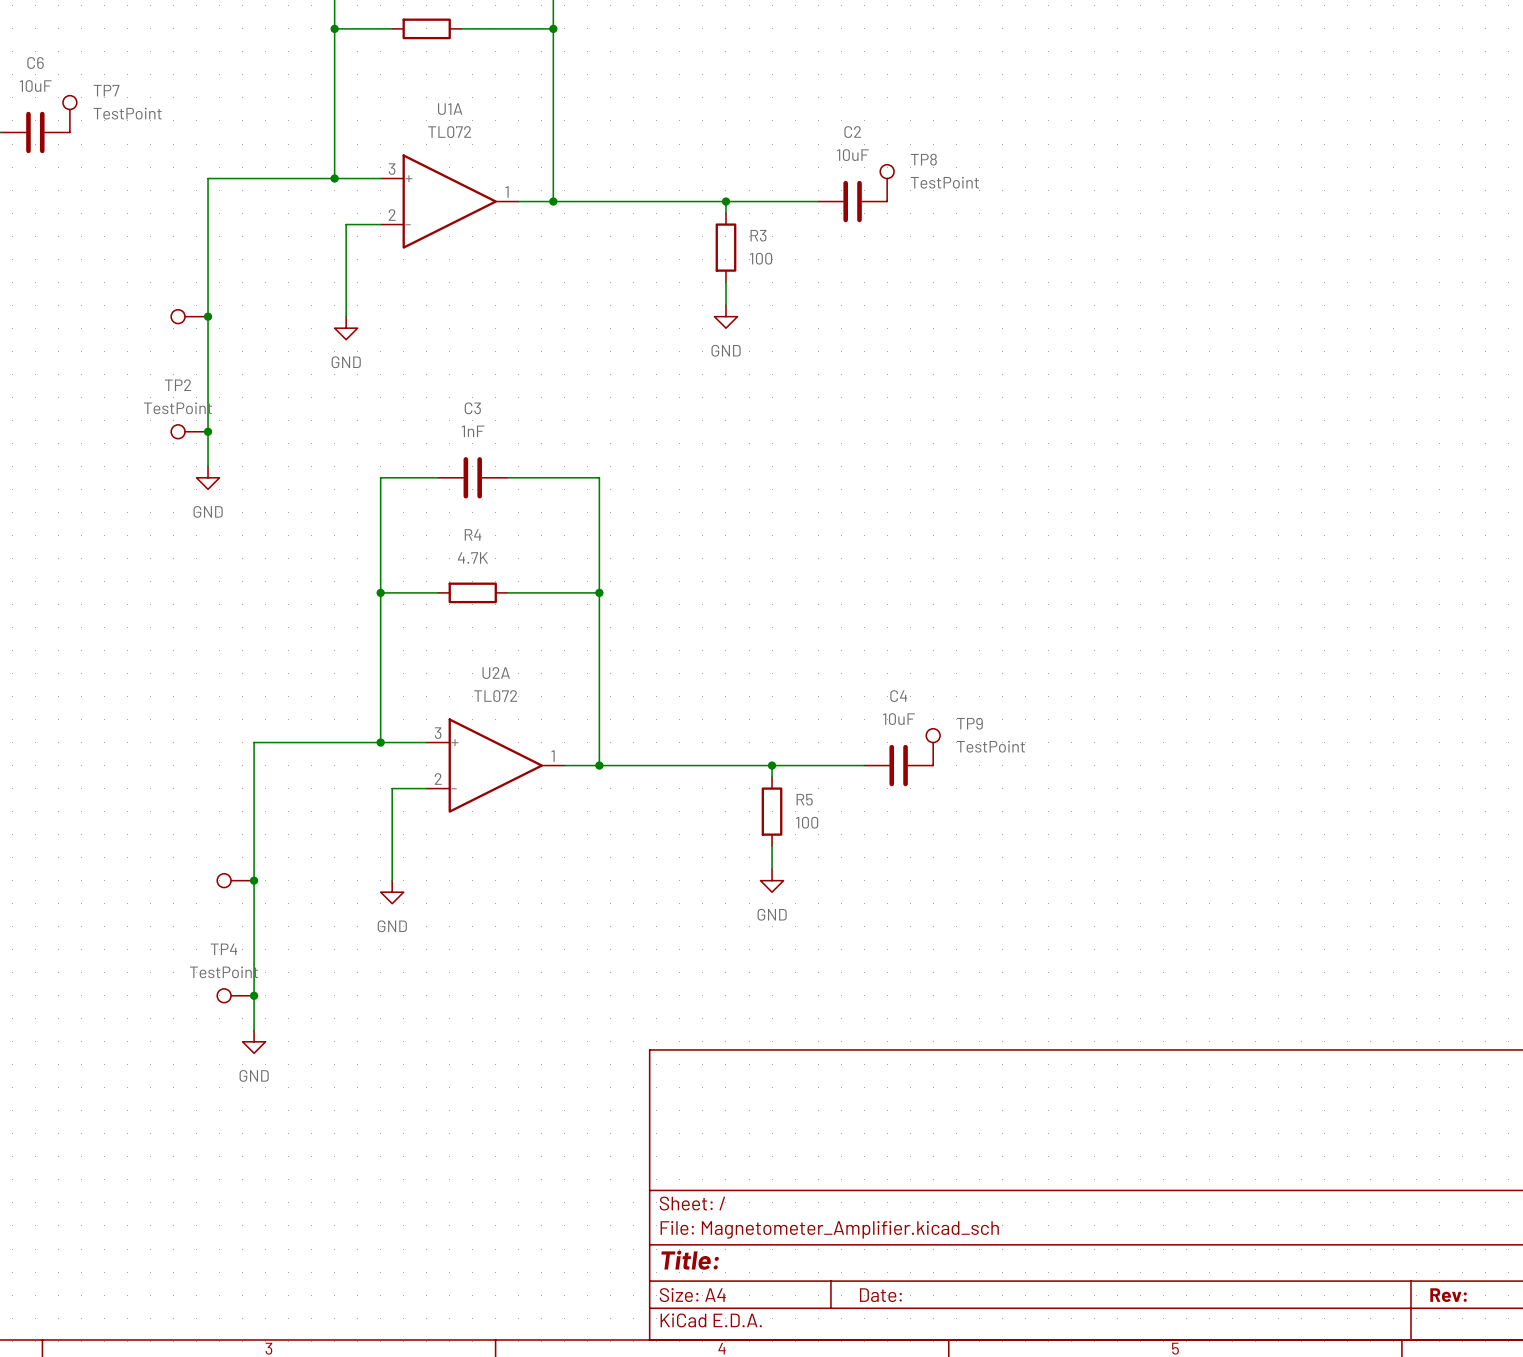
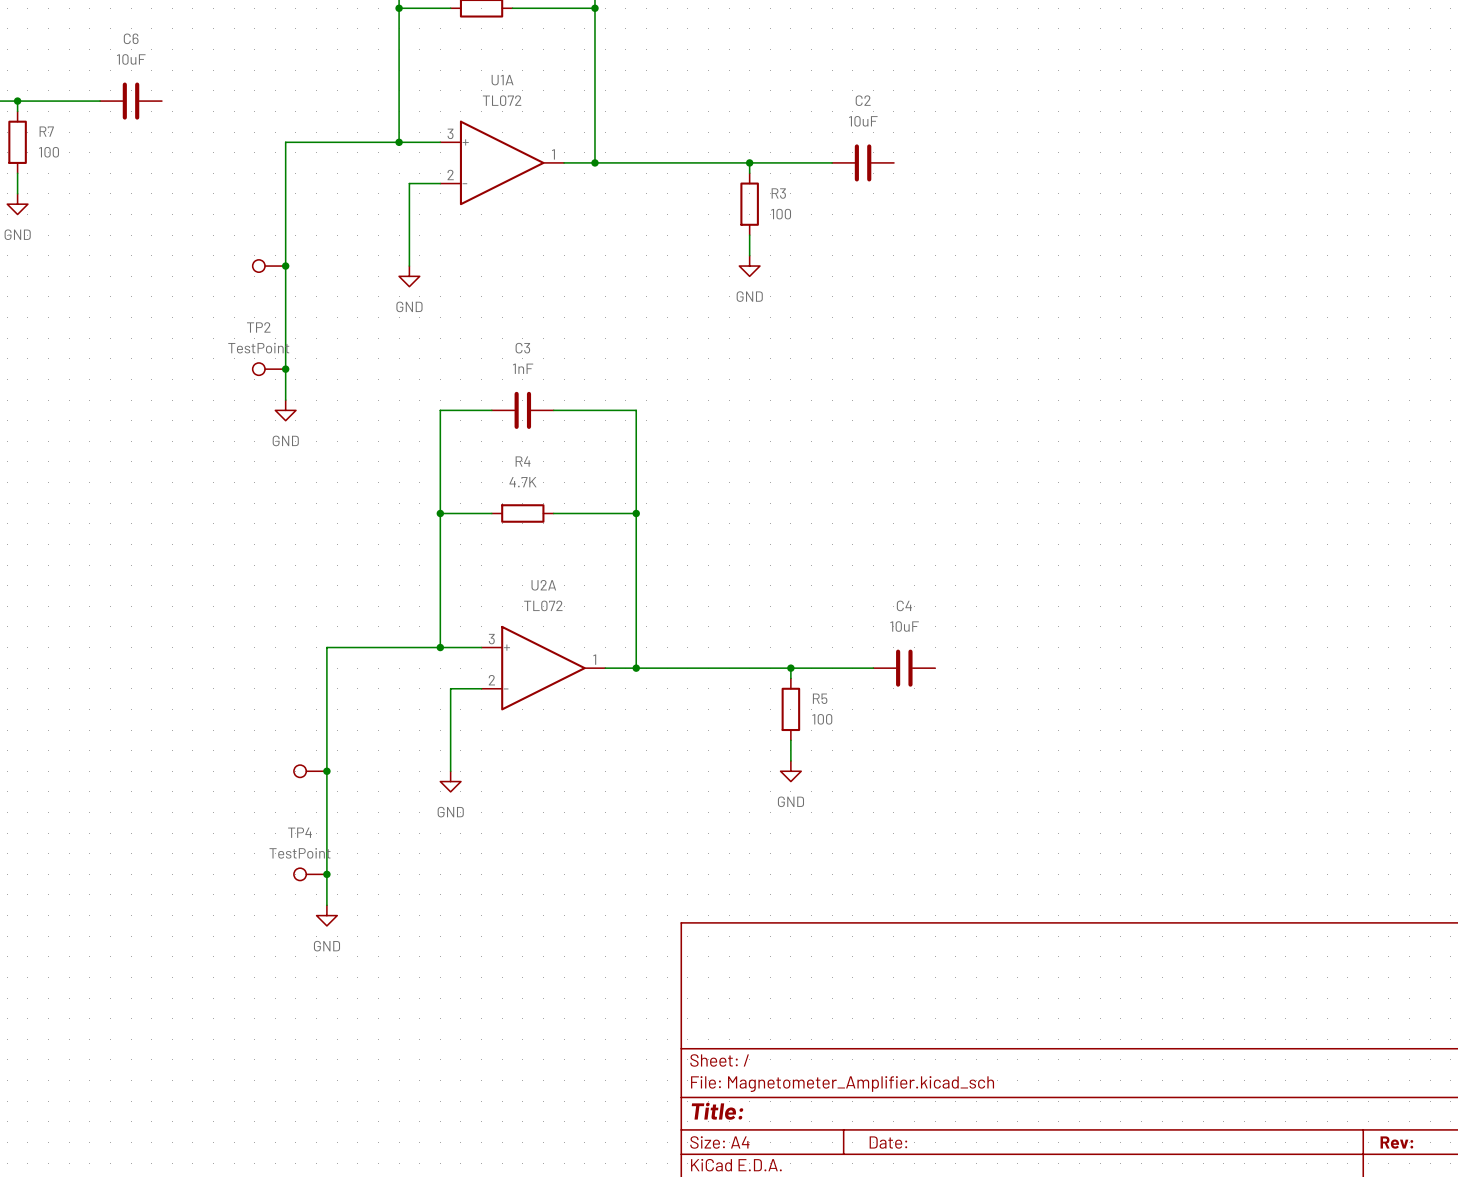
TP7: TestPoint (69, 114) -> none
TP8: TestPoint (887, 183) -> none
TP9: TestPoint (933, 747) -> none

